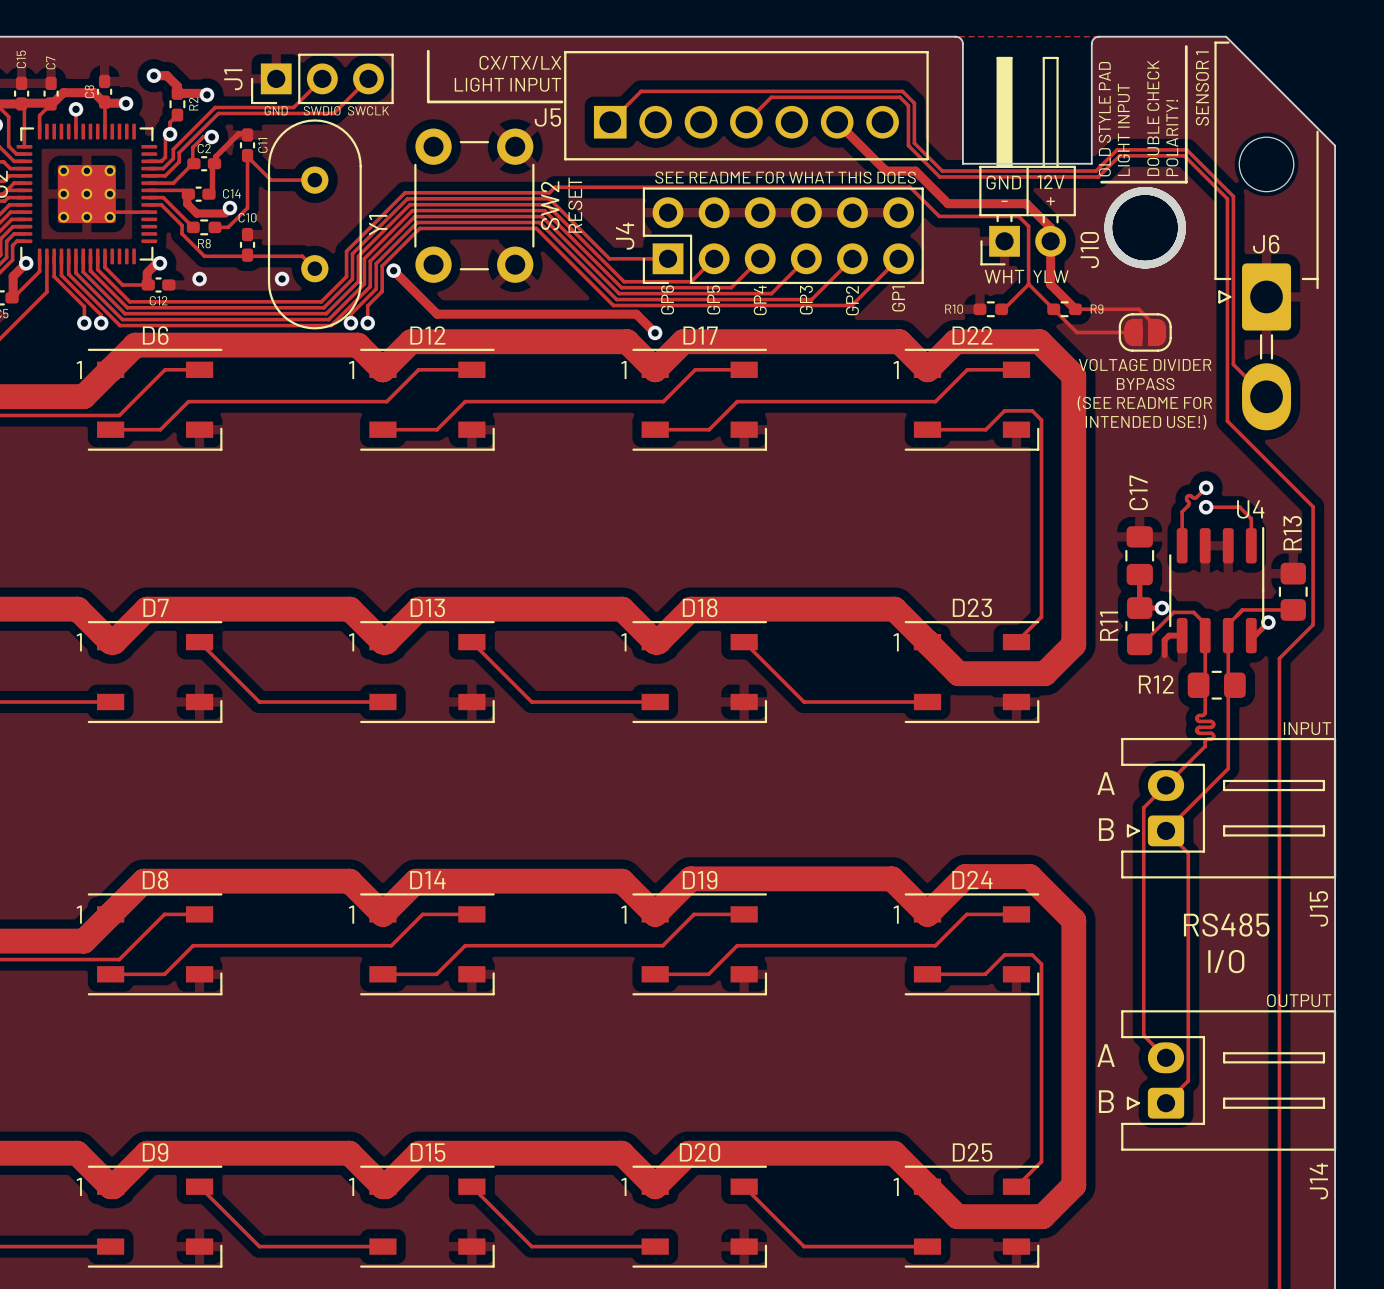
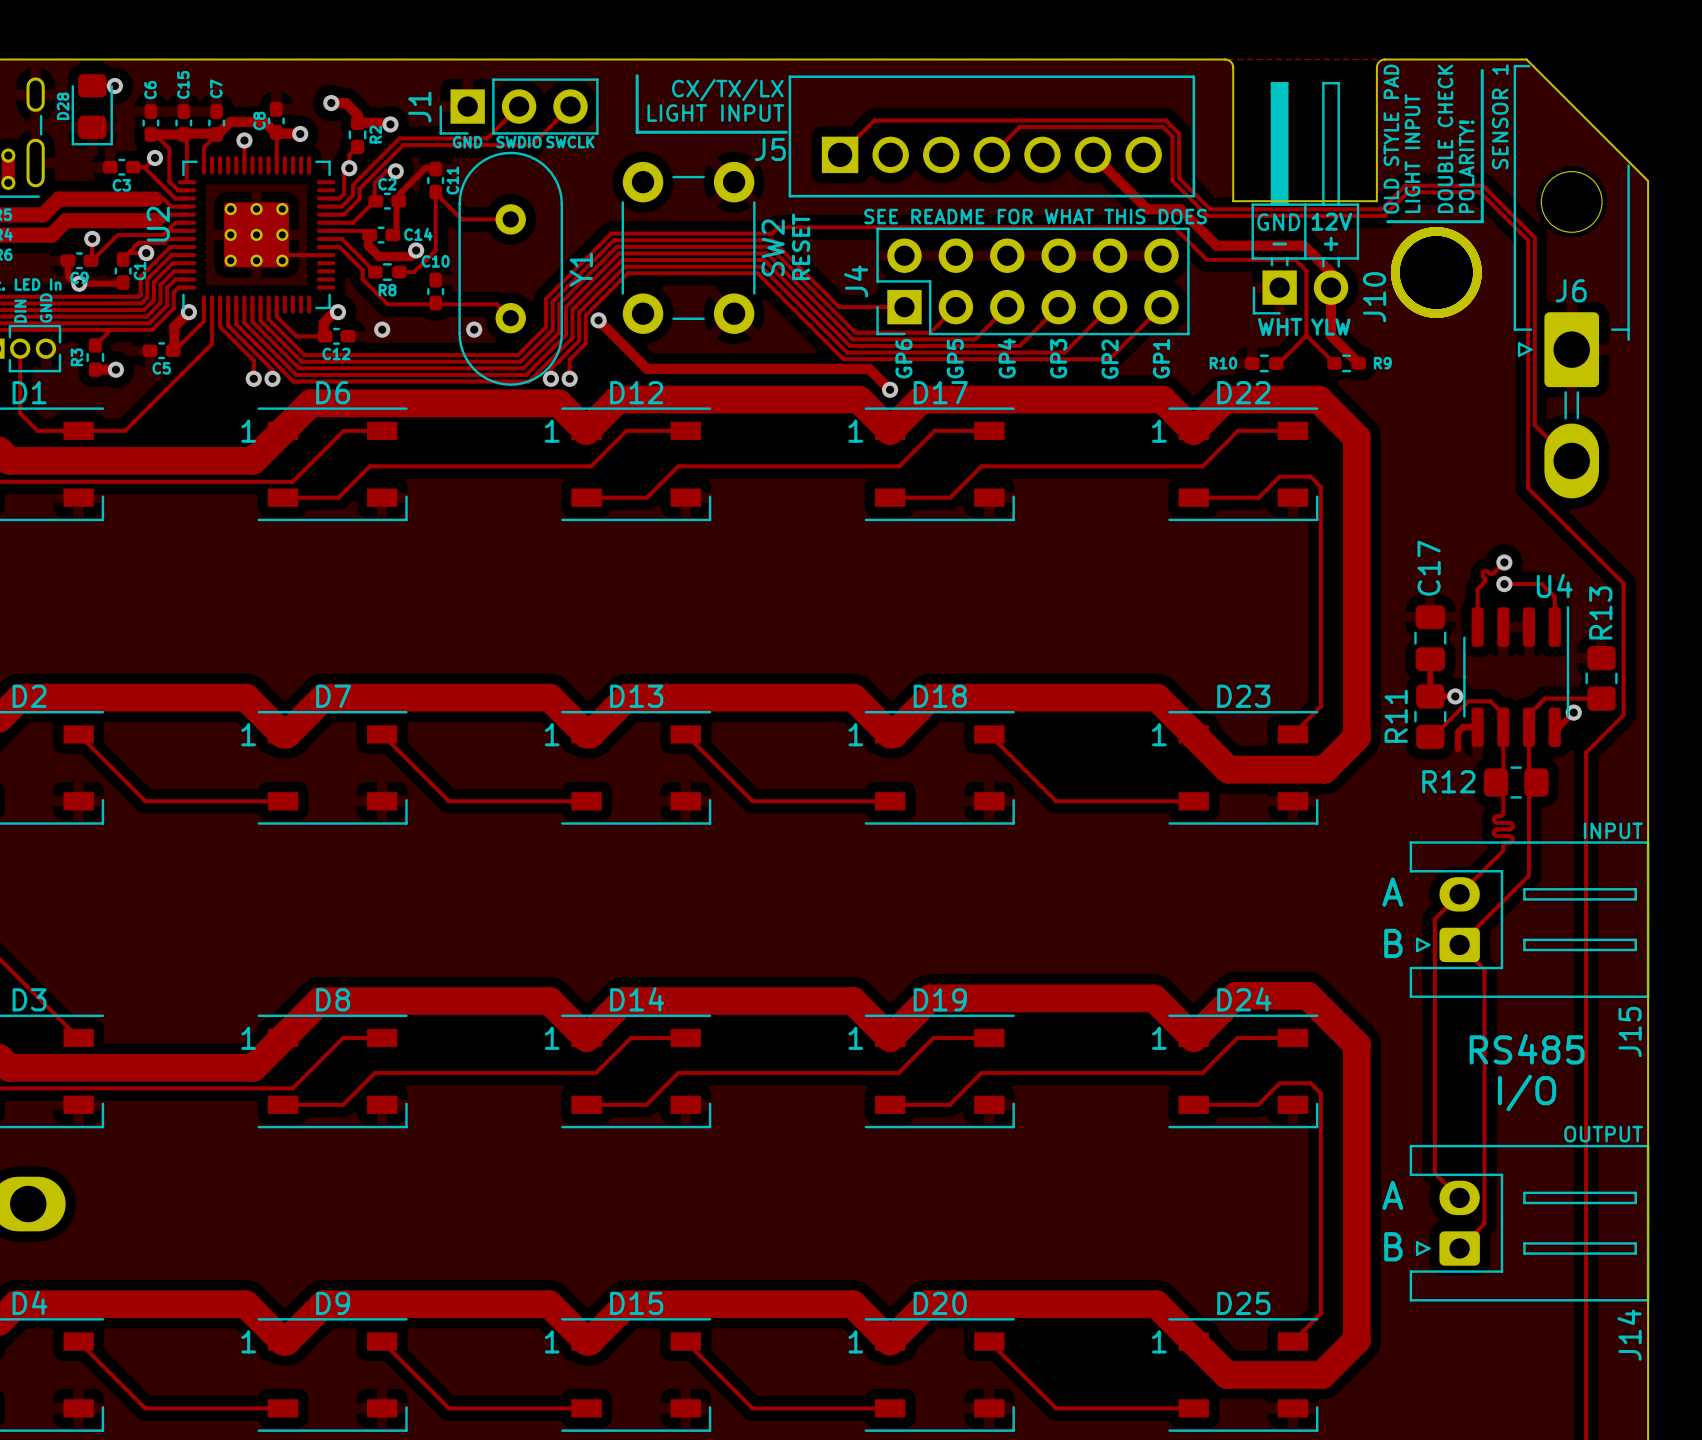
track: (1053, 309) (1076, 332) (1133, 332) -> none
track: (1075, 309) (1138, 309) (1157, 327) (1157, 332) -> none
part: (1145, 332) -> none
text: VOLTAGE DIVIDER (1145, 364) -> none
text: BYPASS (1145, 383) -> none
text: (SEE README FOR (1144, 403) -> none
text: INTENDED USE!) (1146, 422) -> none

